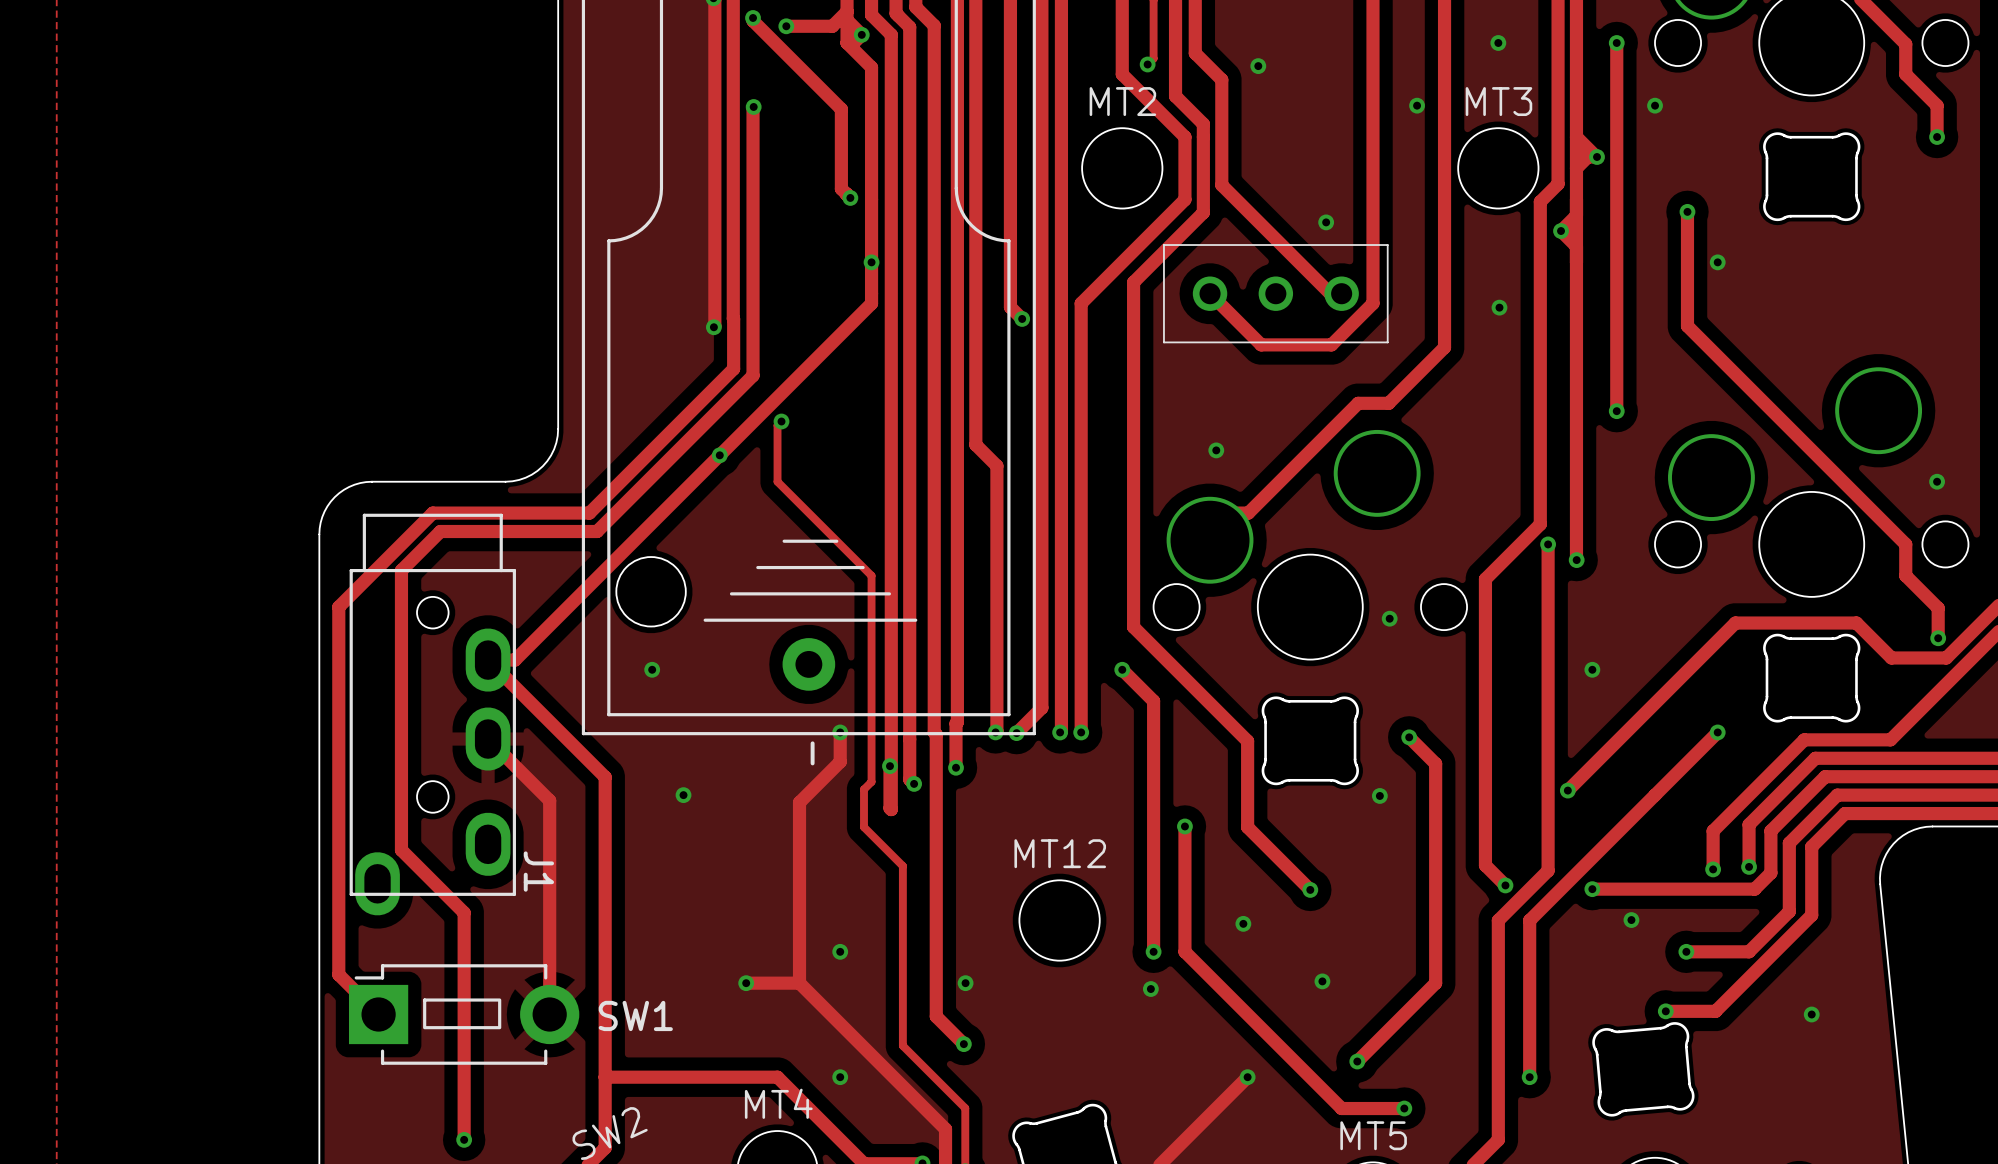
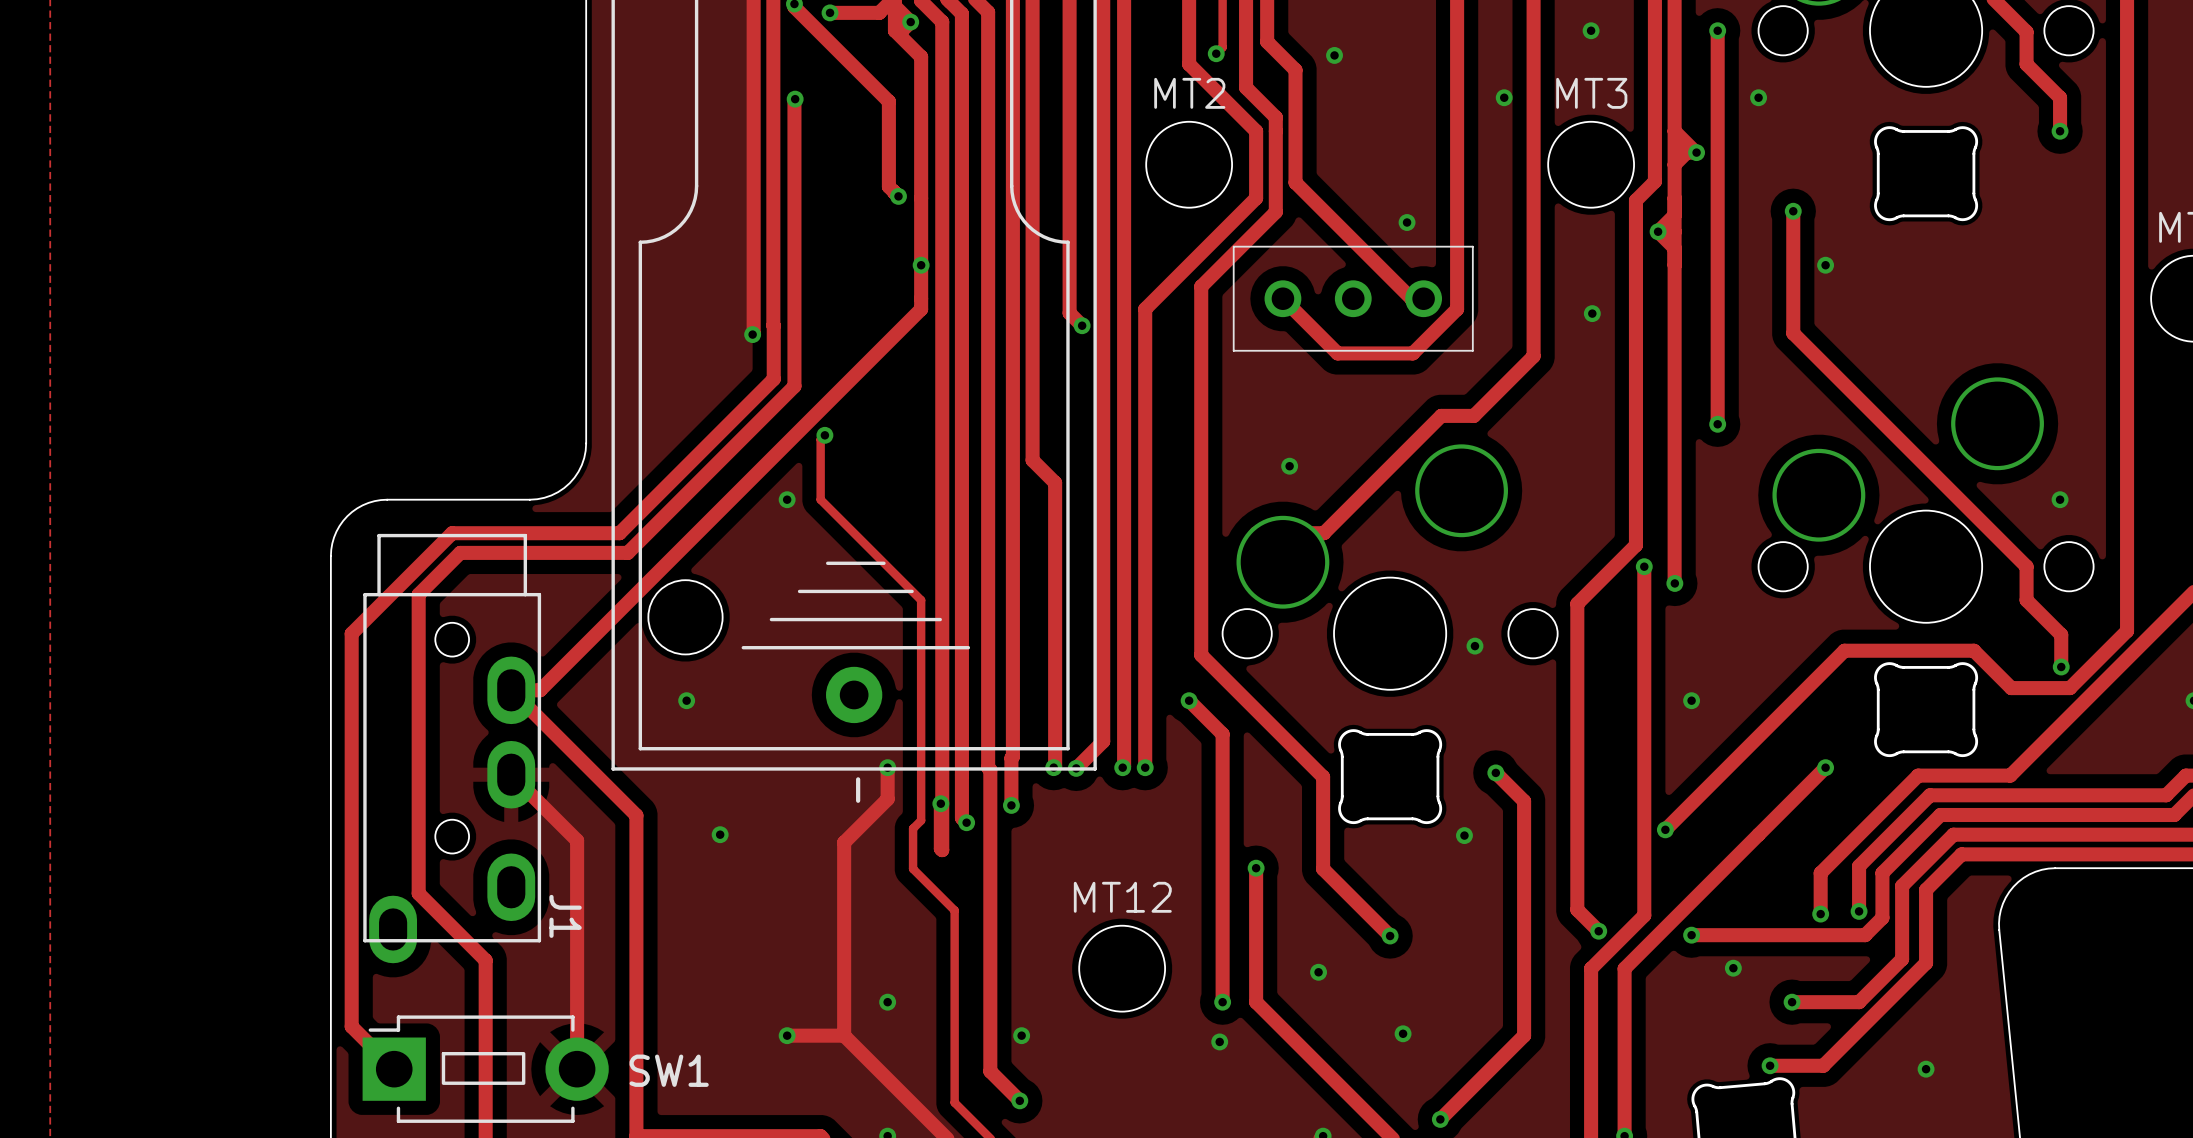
via position: (719, 455) -> (787, 499)

